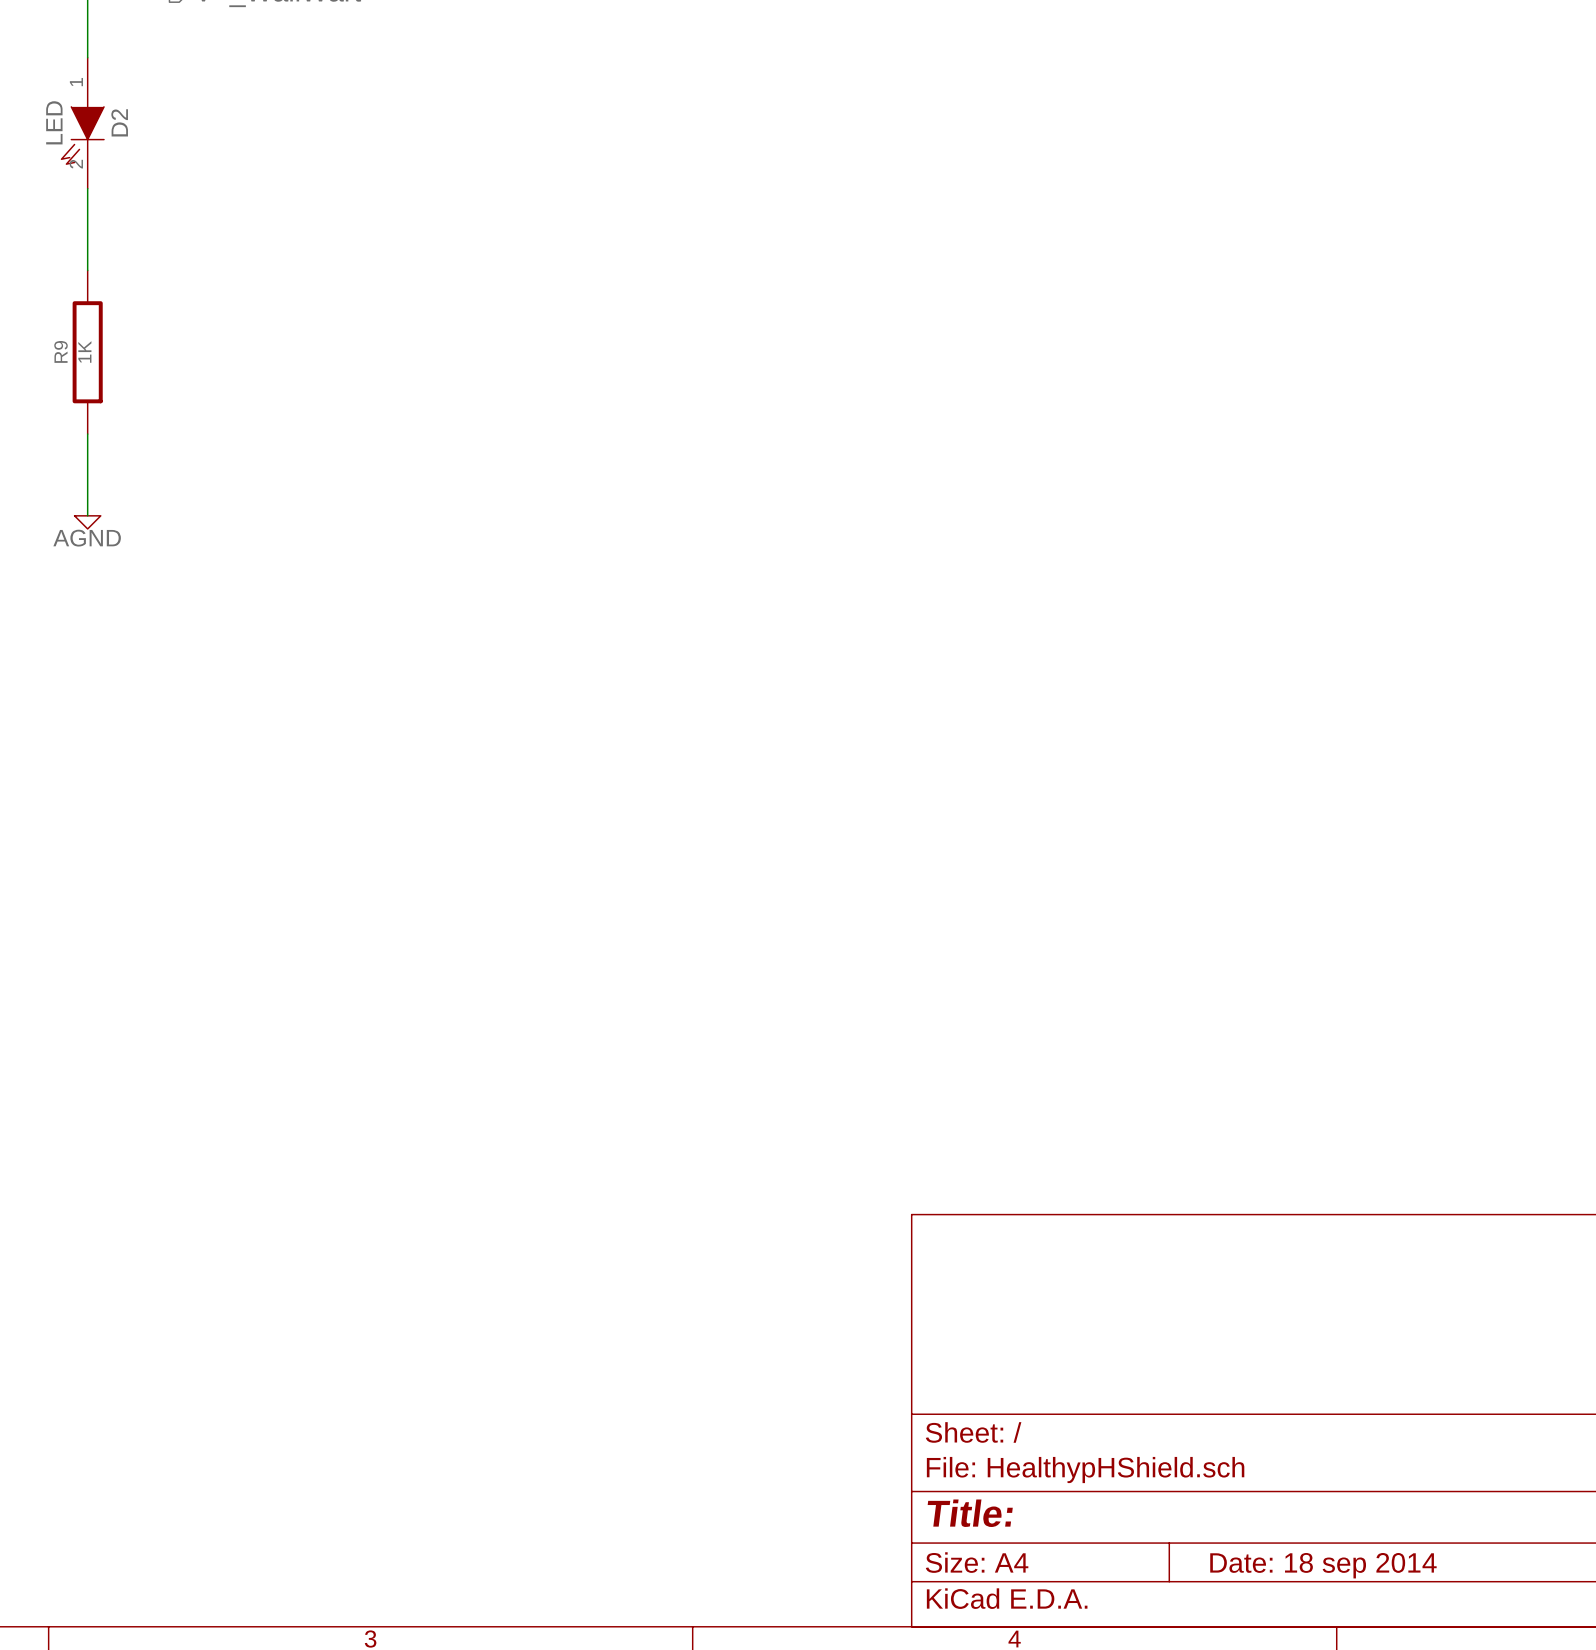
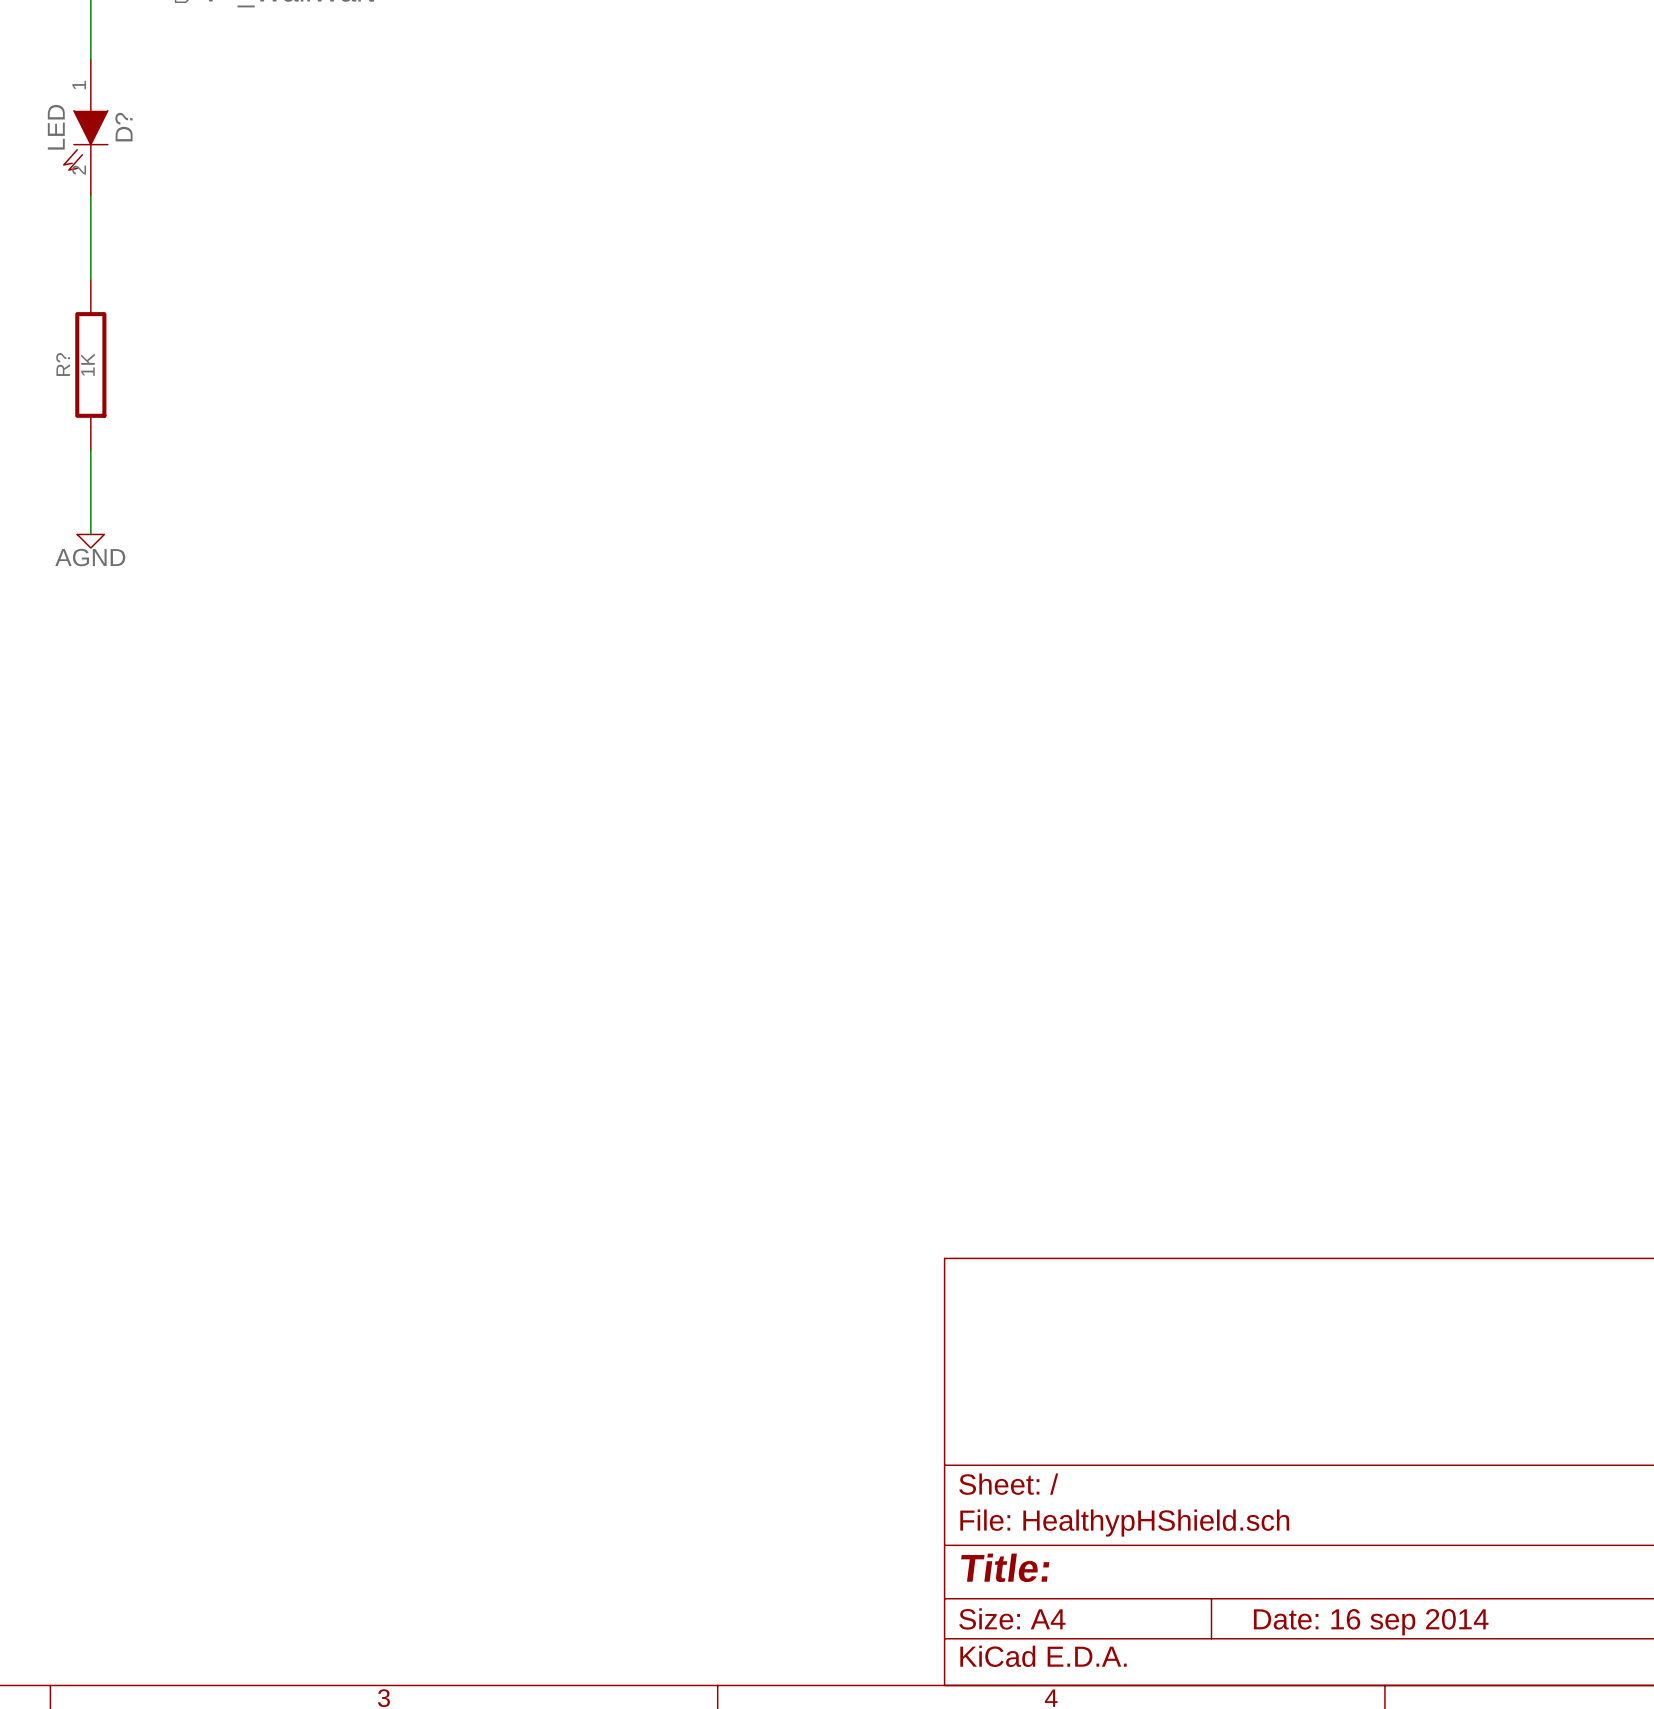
D2 name: D2 (119, 122) -> D? (123, 127)
R9 name: R9 (61, 351) -> R? (63, 364)
title block: Date: 18 sep 2014 (1323, 1565) -> Date: 16 sep 2014 (1371, 1622)

